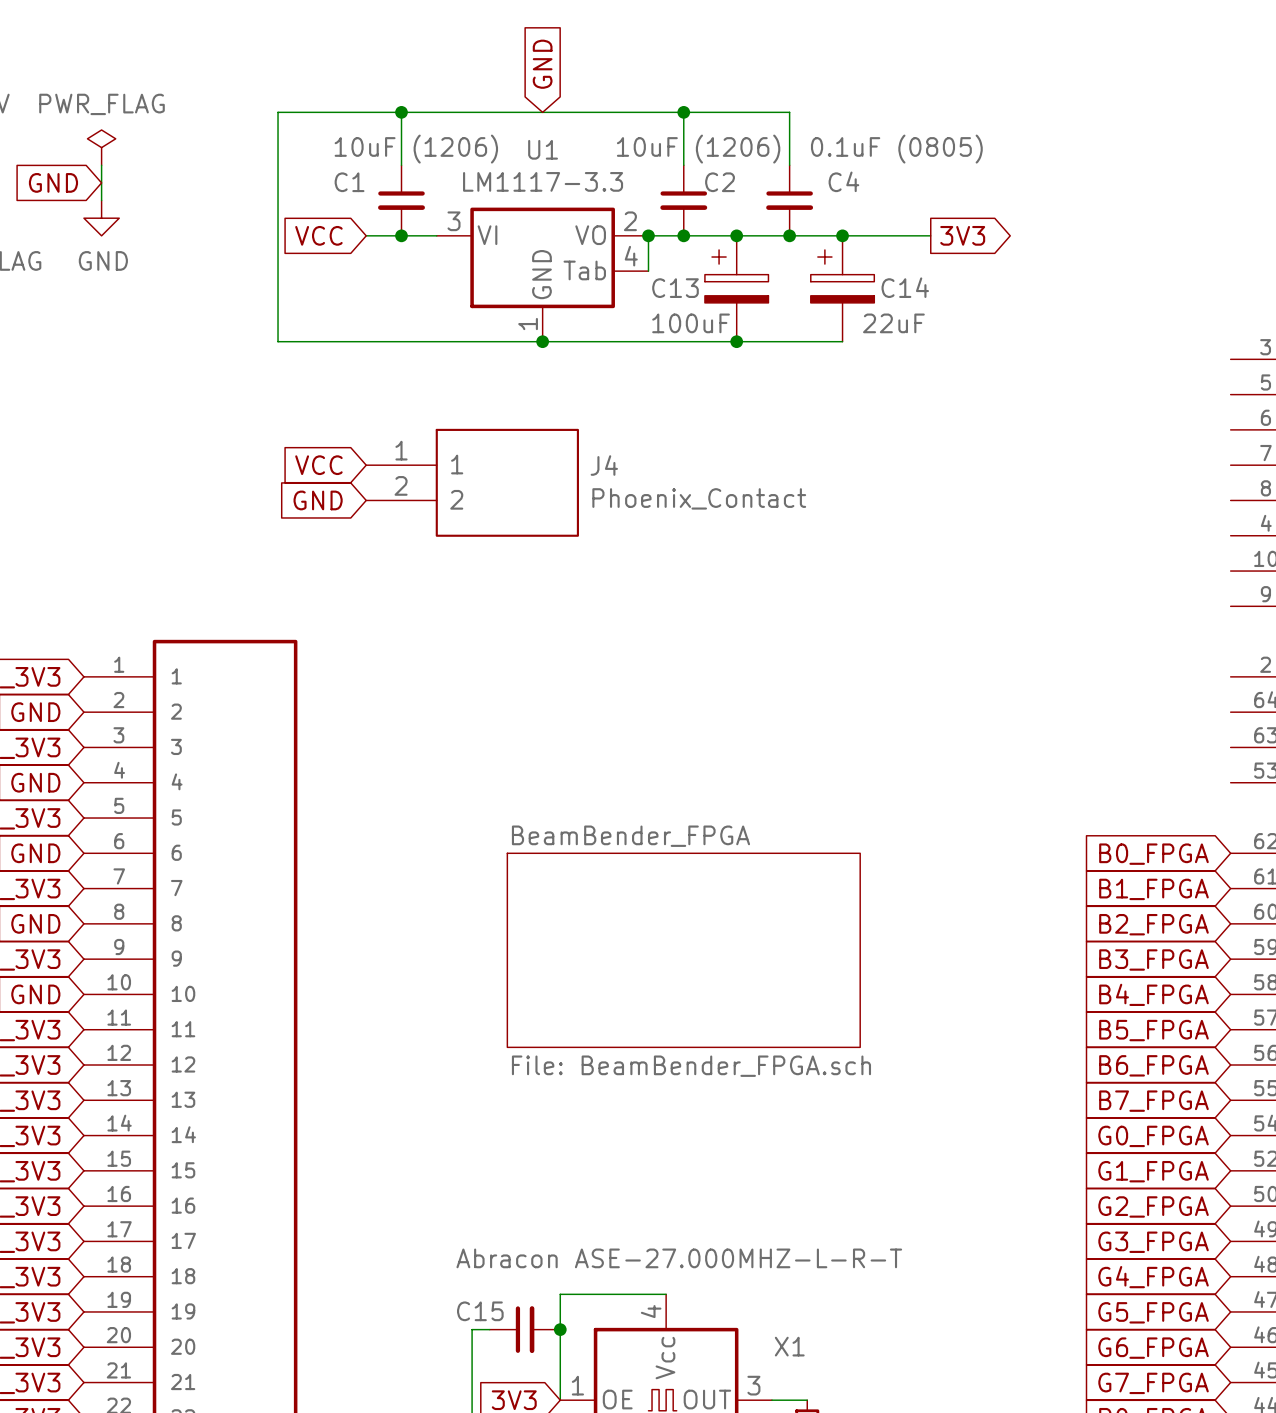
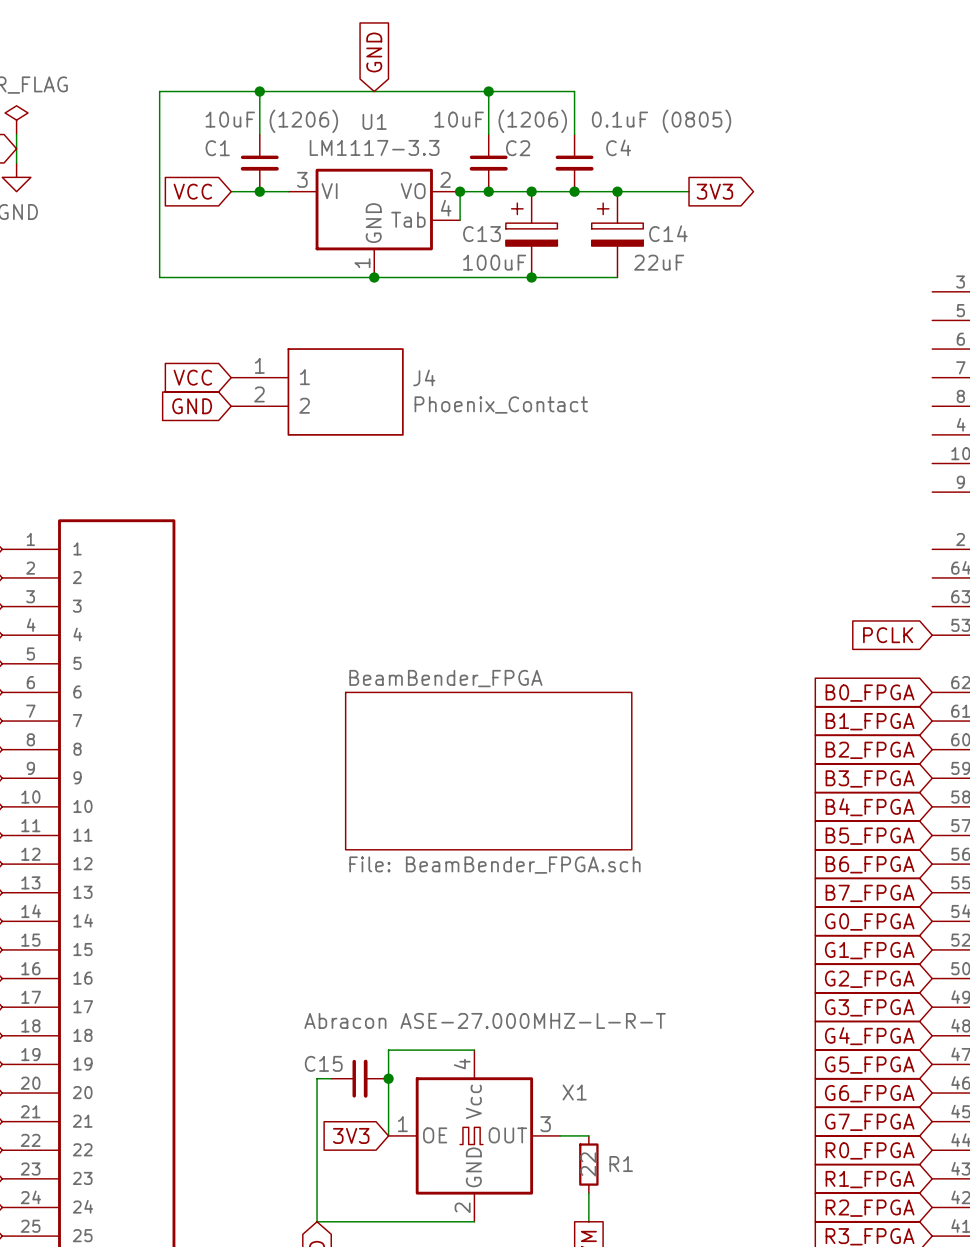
global label: none -> PCLK (888, 635)

